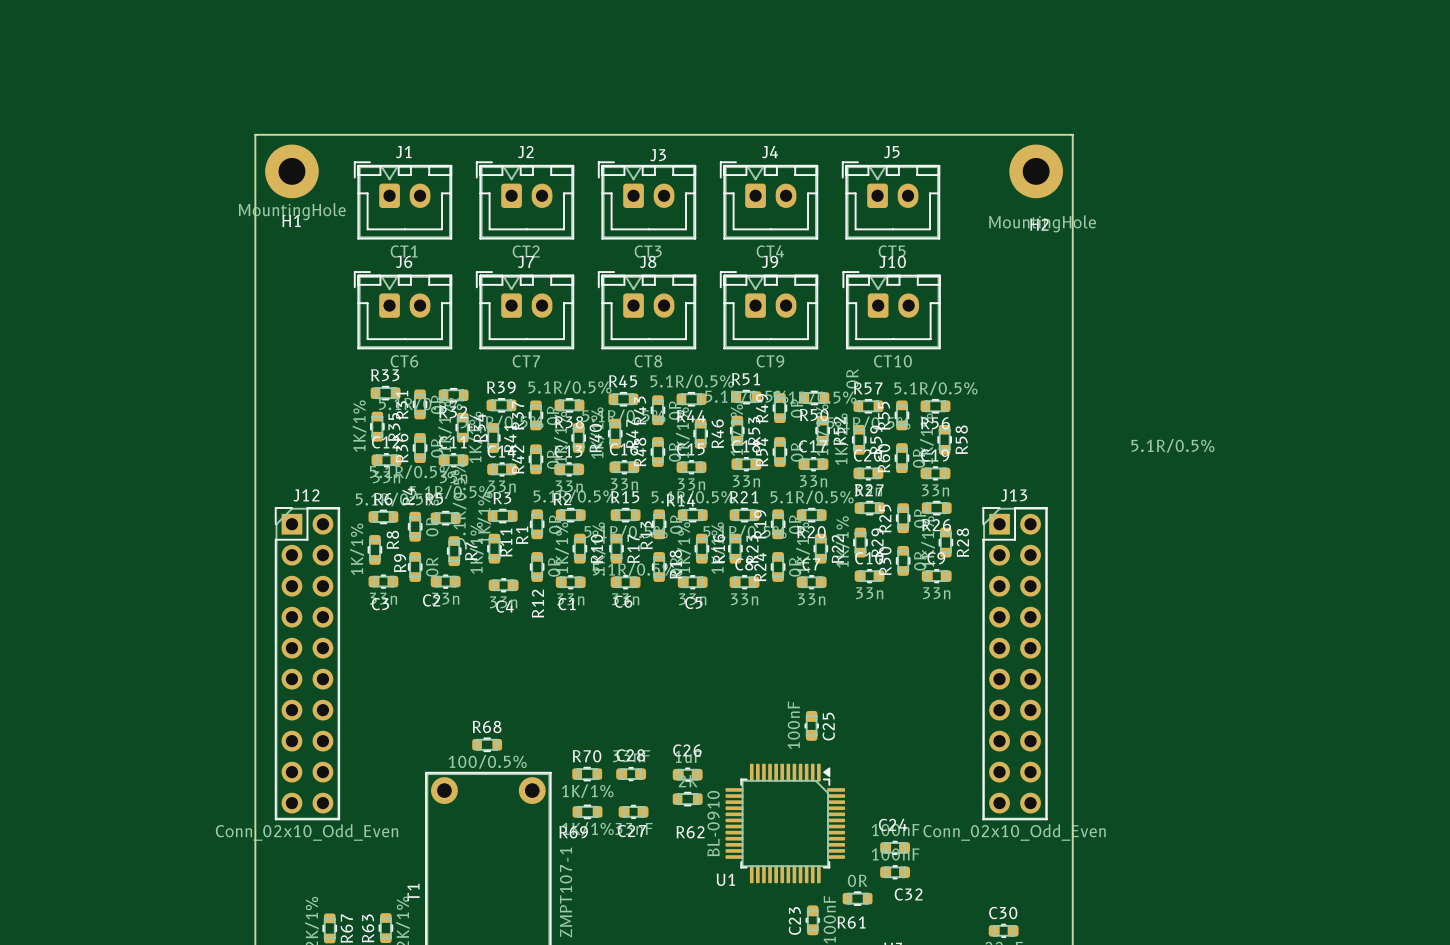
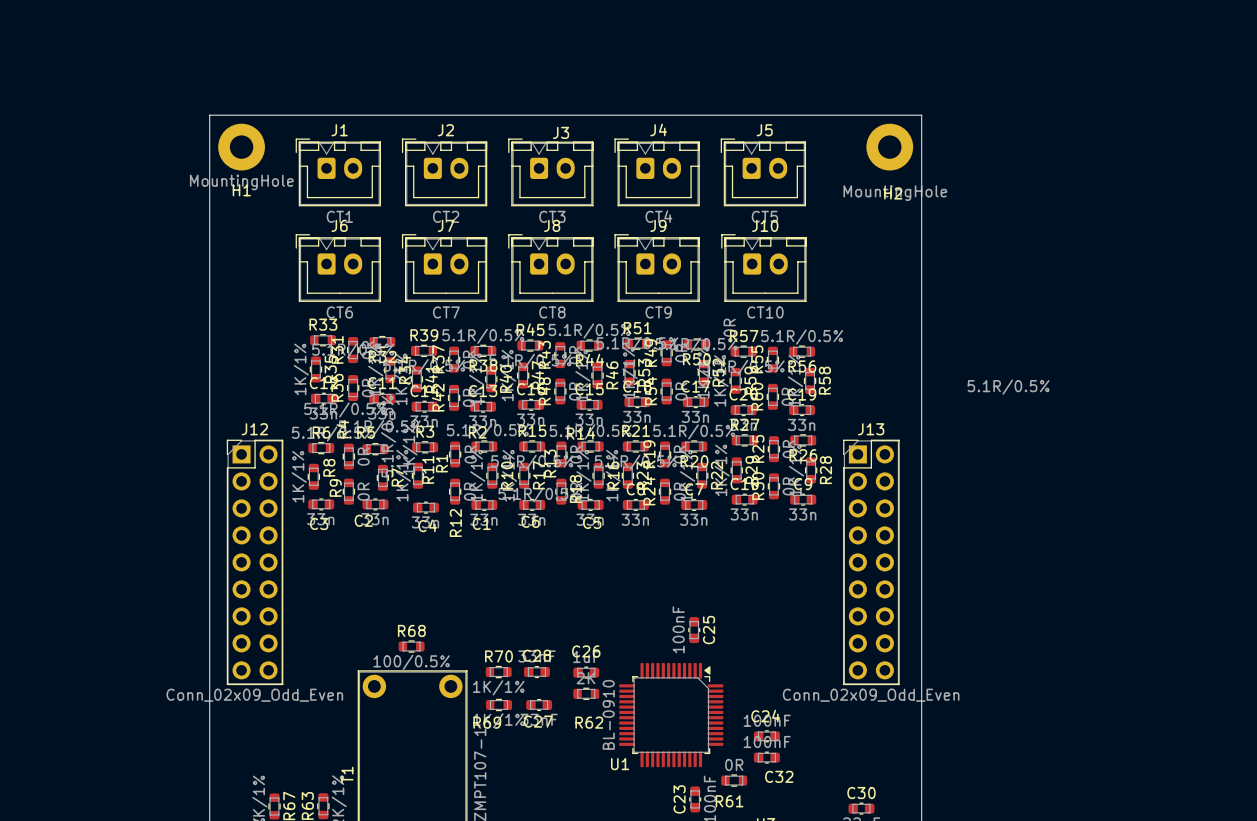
J12 footprint: [275, 507, 340, 821] -> [226, 439, 284, 686]
J13 footprint: [982, 507, 1048, 821] -> [843, 439, 900, 686]
J12 value: Conn_02x10_Odd_Even (307, 832) -> Conn_02x09_Odd_Even (254, 695)
J13 value: Conn_02x10_Odd_Even (1014, 832) -> Conn_02x09_Odd_Even (871, 695)

